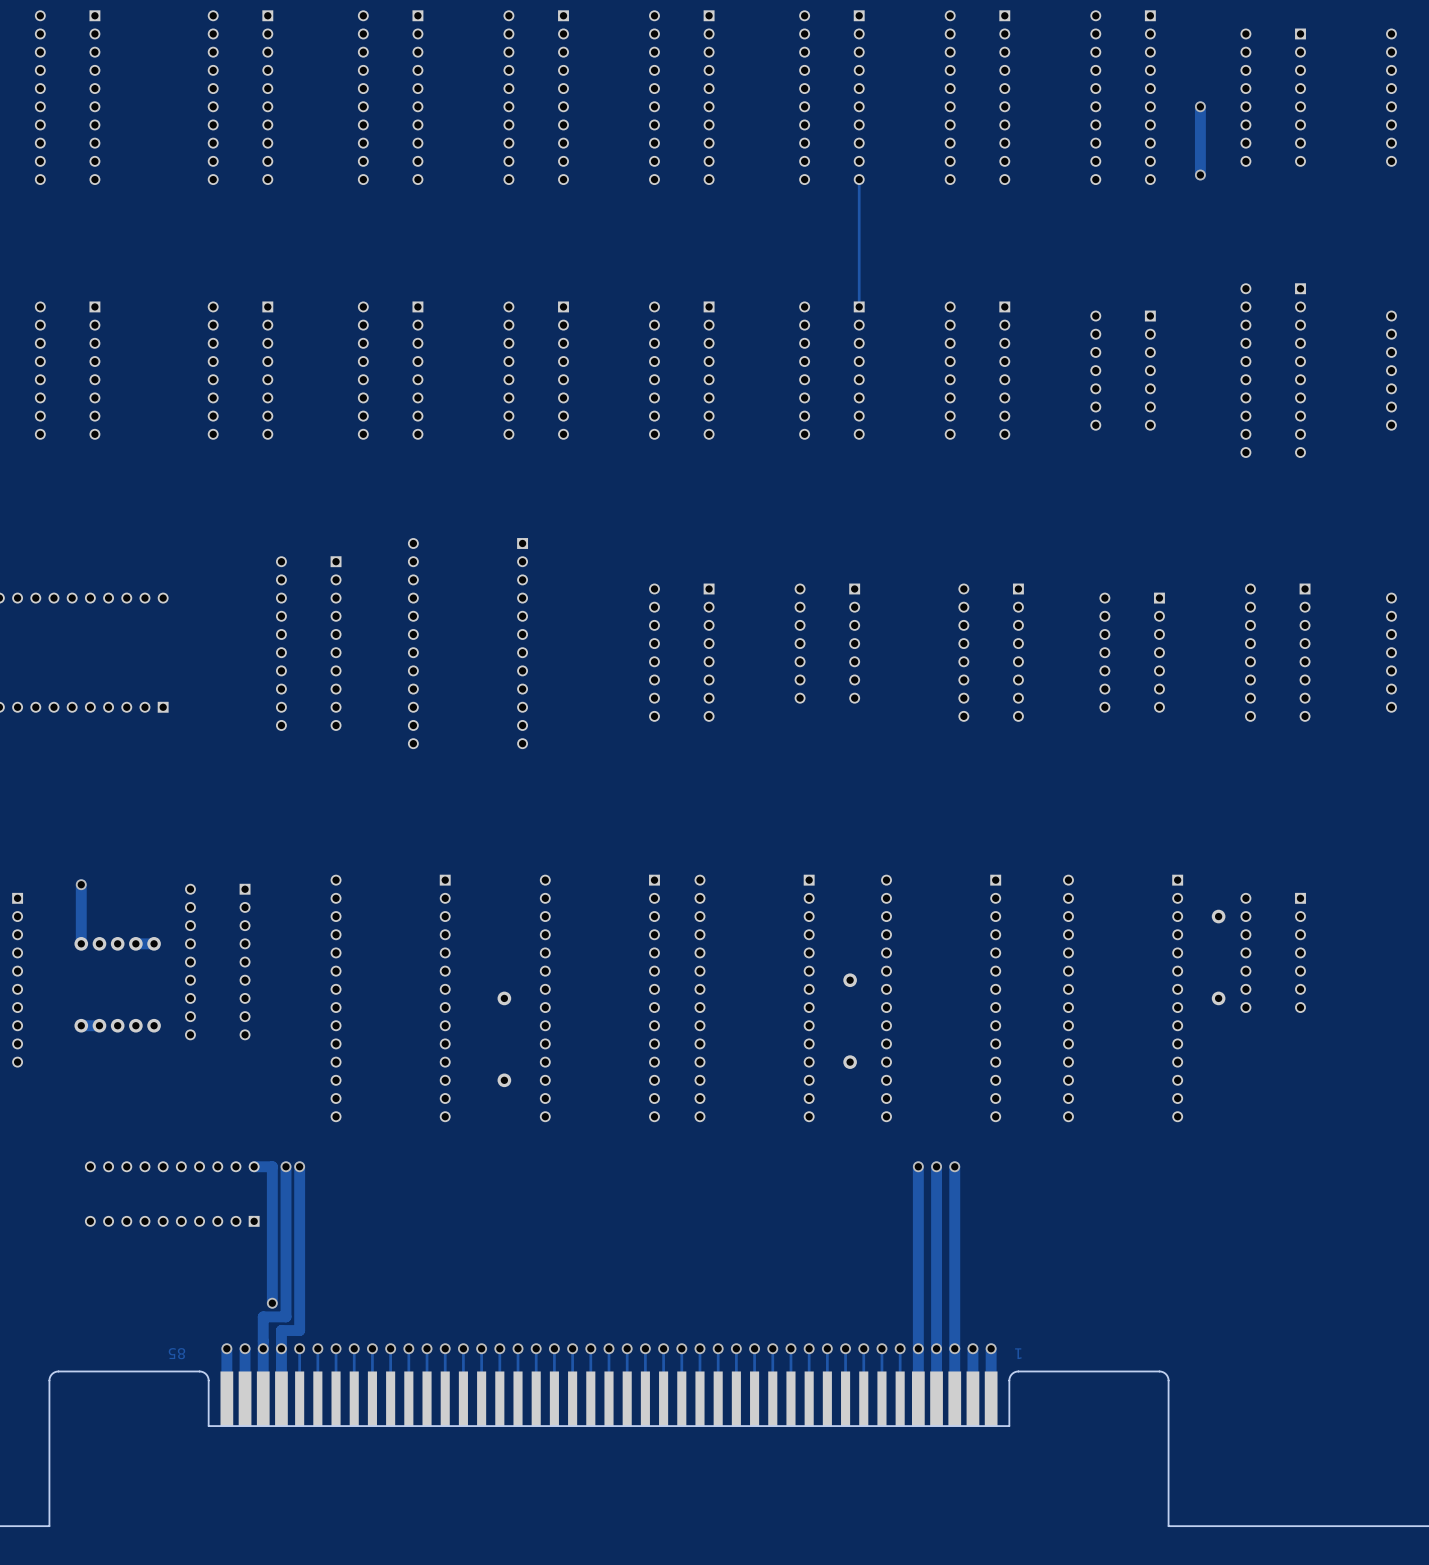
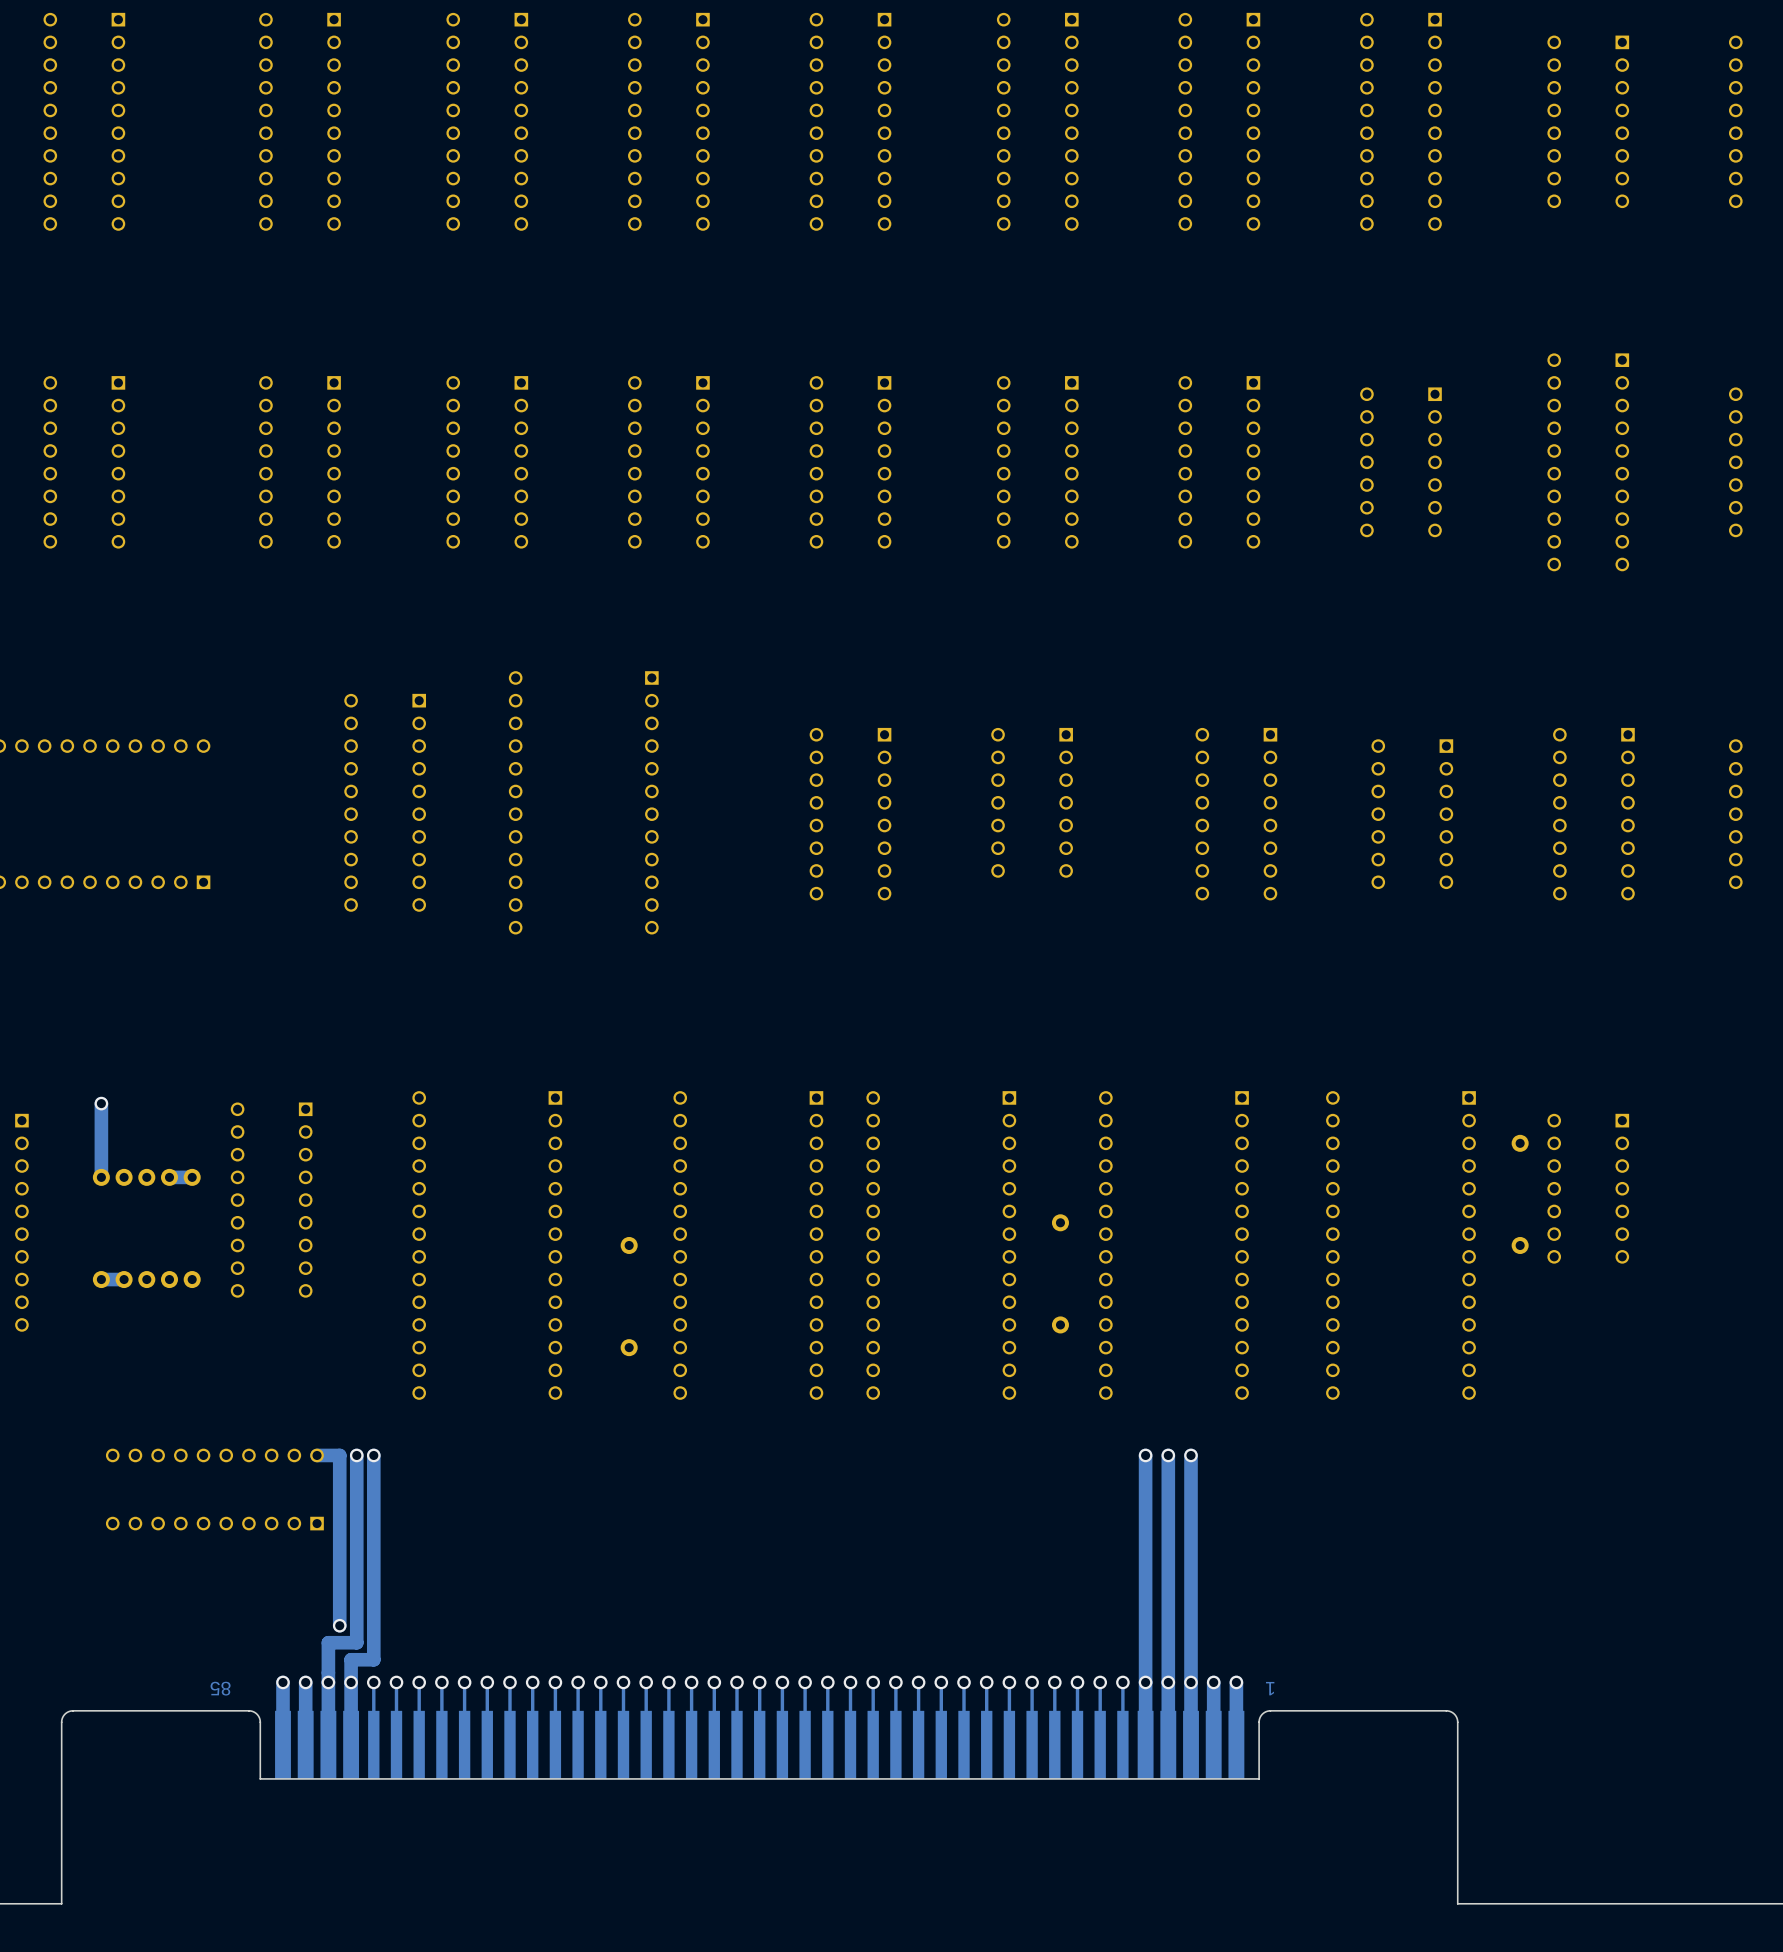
track: (1200, 106) (1200, 174) -> none
via: (1200, 106) -> none
via: (1200, 174) -> none
track: (859, 179) (859, 306) -> none

